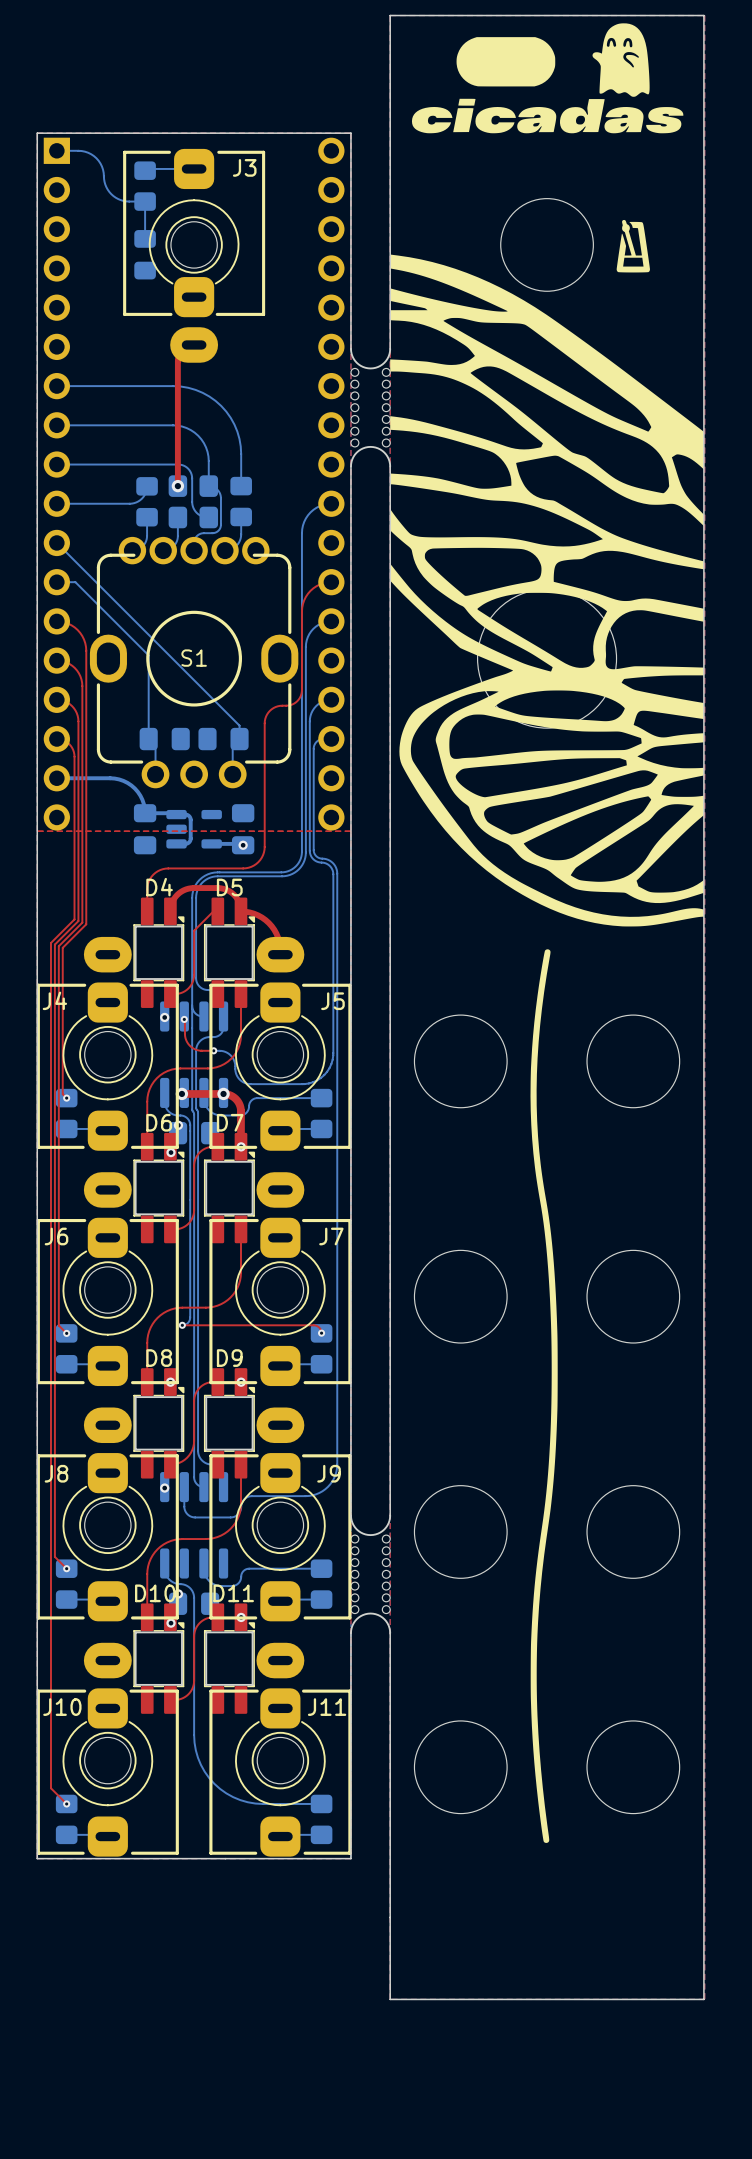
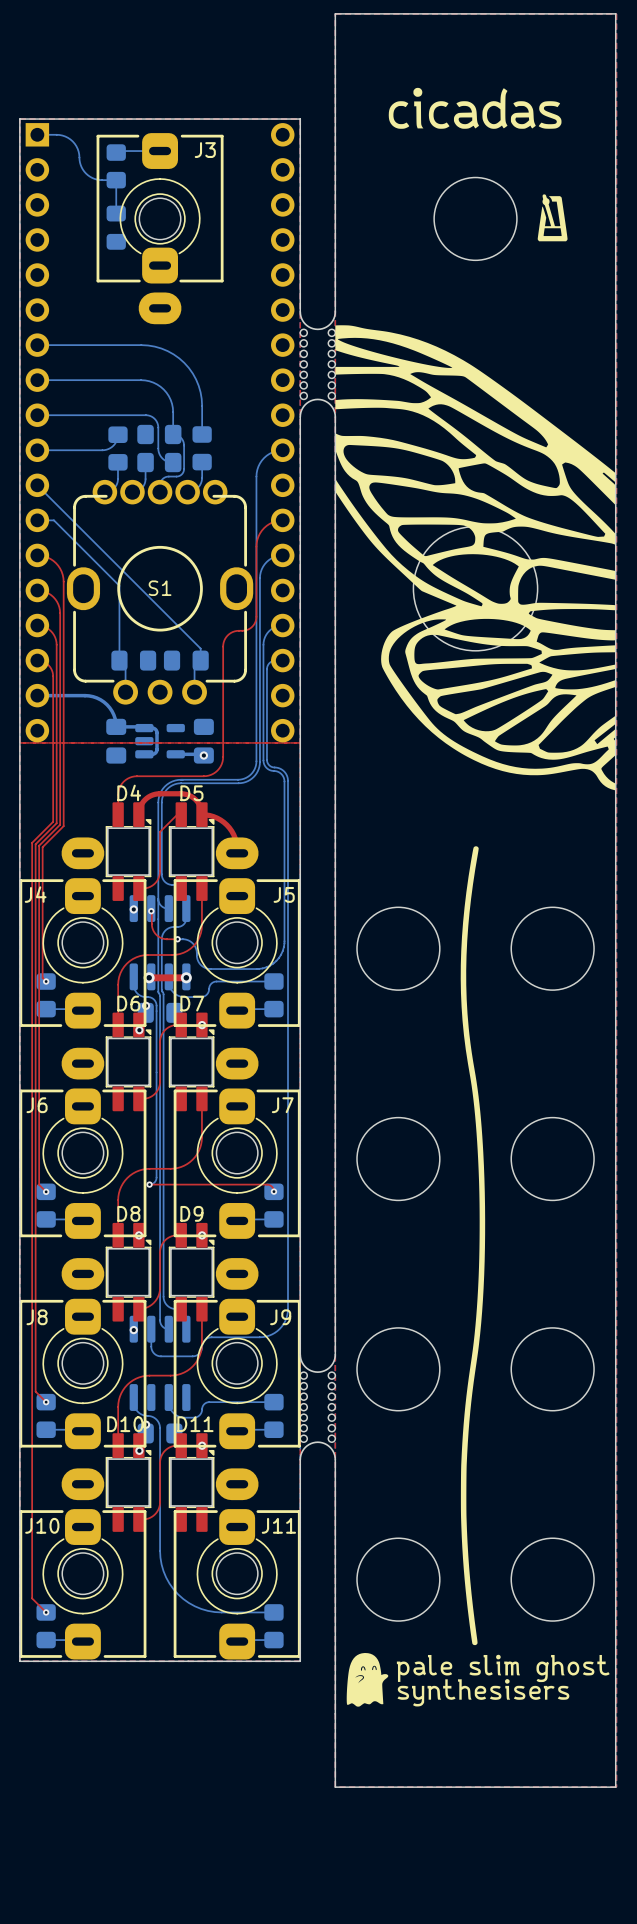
drawing: [390, 23, 704, 1843] -> none
drawing: none -> [335, 87, 616, 1707]
top track: (194, 344) (184, 348) (178, 359) (177, 486) -> none
via: (177, 486) -> none
top track: (223, 1093) (232, 1096) (240, 1105) (240, 1146) -> none

